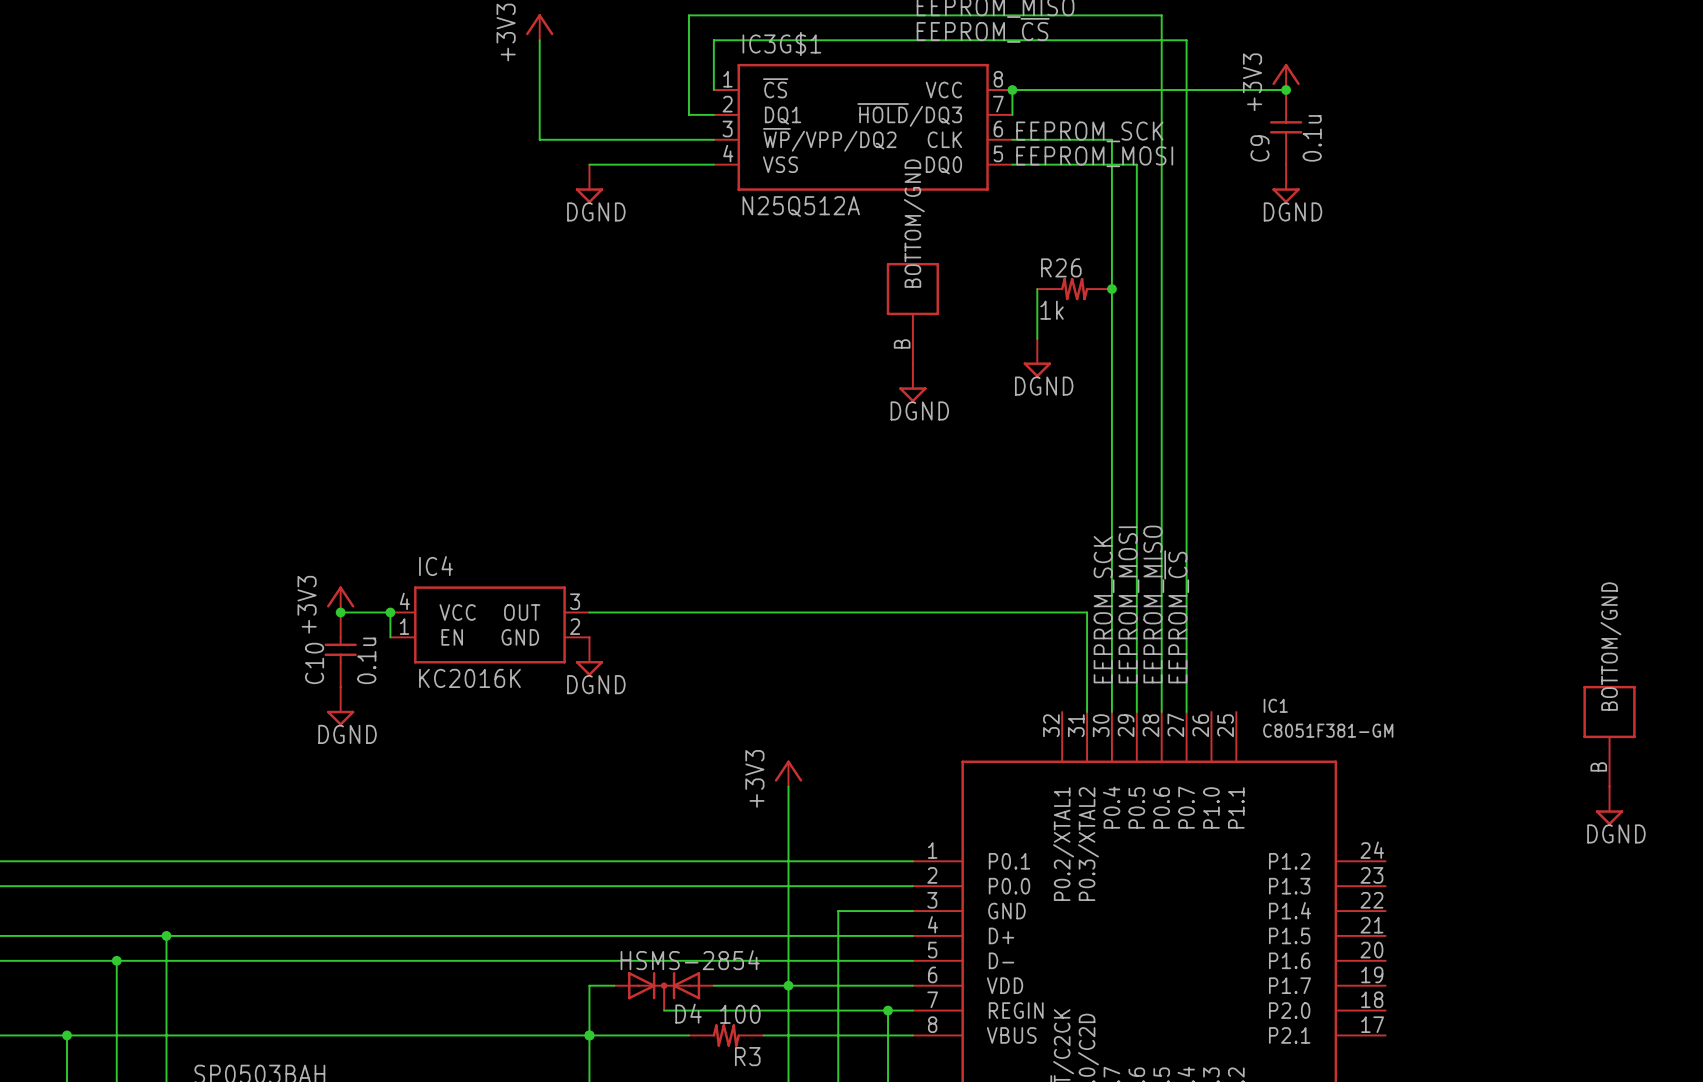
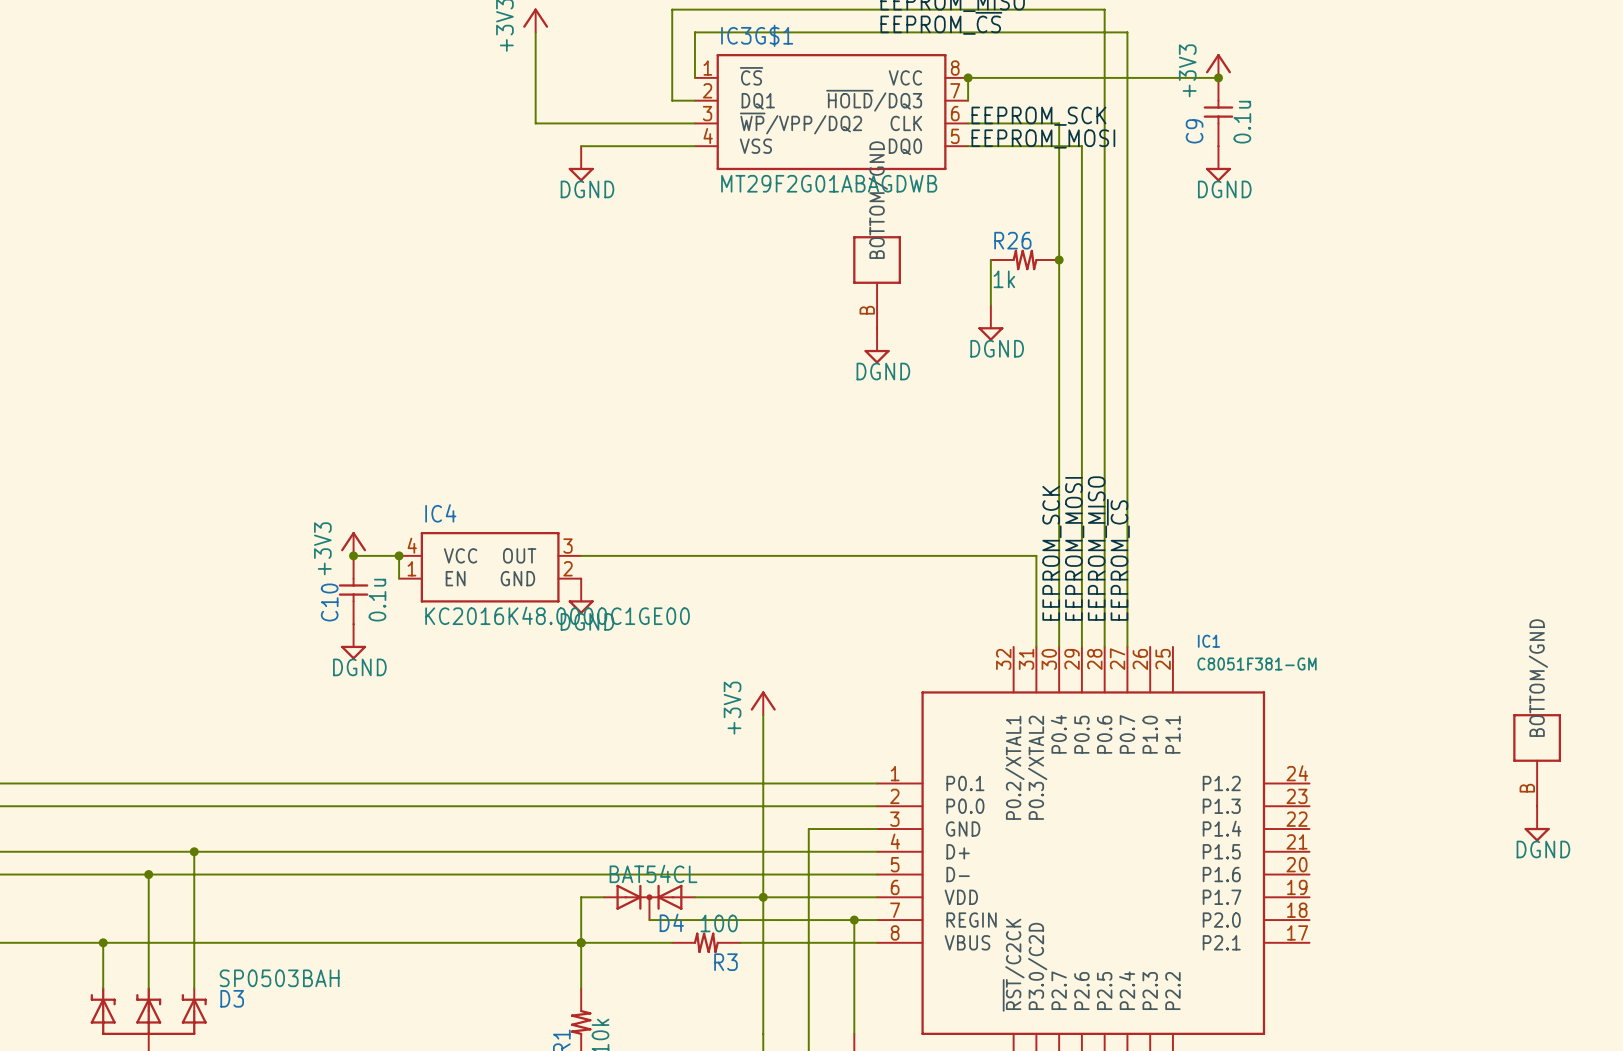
IC3G$1 value: N25Q512A (801, 206) -> MT29F2G01ABAGDWB (829, 183)
IC4 value: KC2016K (469, 678) -> KC2016K48.0000C1GE00 (557, 615)
part position: (1609, 736) -> (1537, 760)
power symbol position: DGND (1609, 805) -> DGND (1537, 823)
D4 value: HSMS-2854 (690, 960) -> BAT54CL (653, 873)

